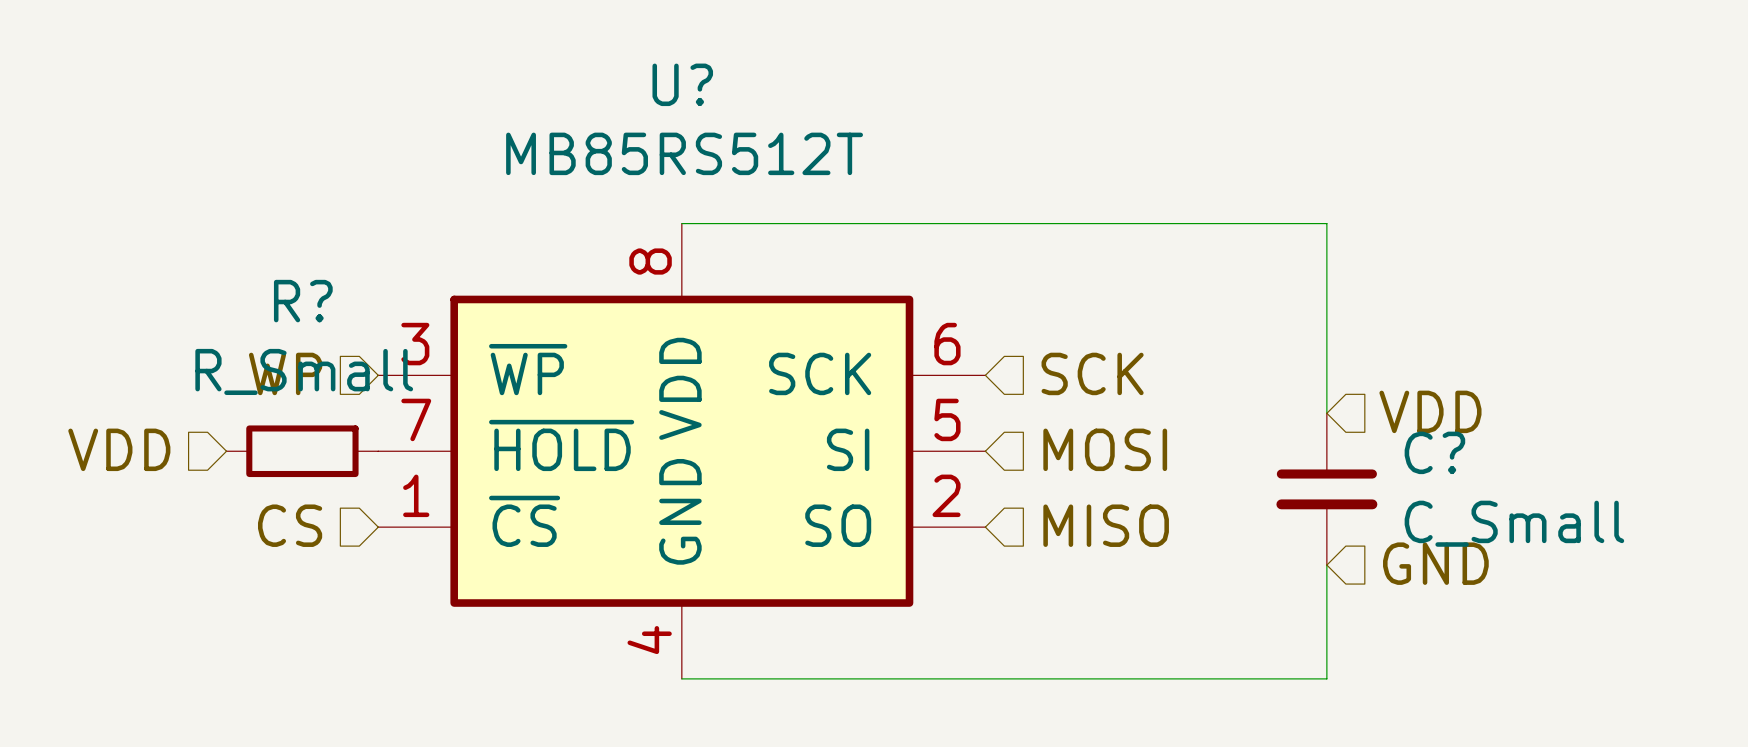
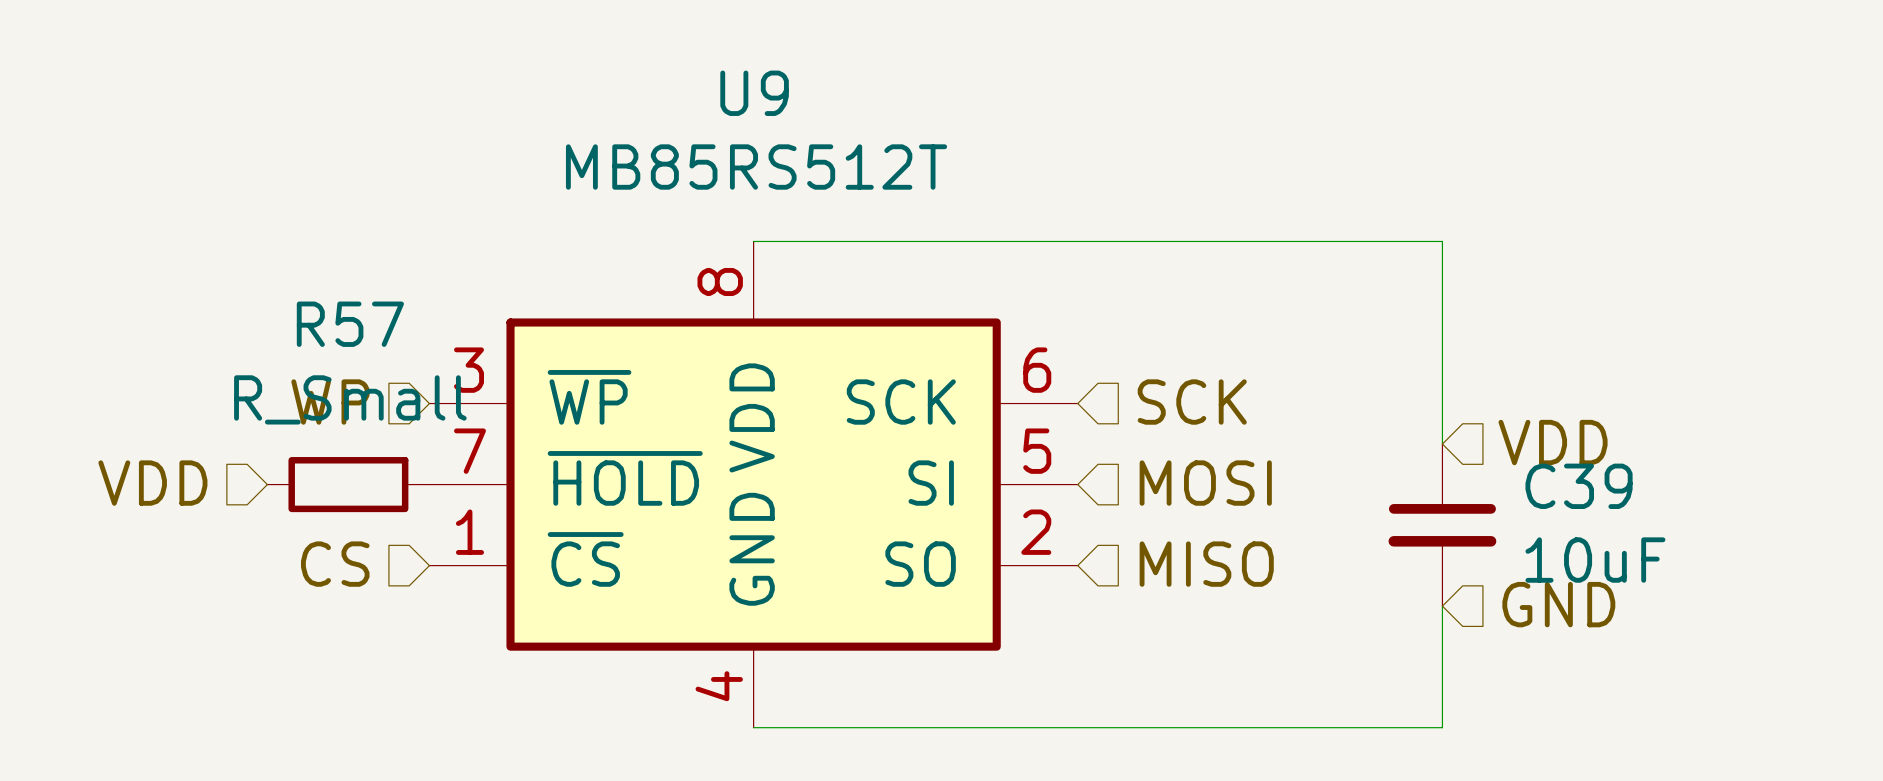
U? name: U? (682, 84) -> U9 (754, 93)
R? name: R? (303, 301) -> R57 (350, 324)
C? name: C? (1434, 452) -> C39 (1579, 486)
C? value: C_Small (1514, 523) -> 10uF (1595, 560)

